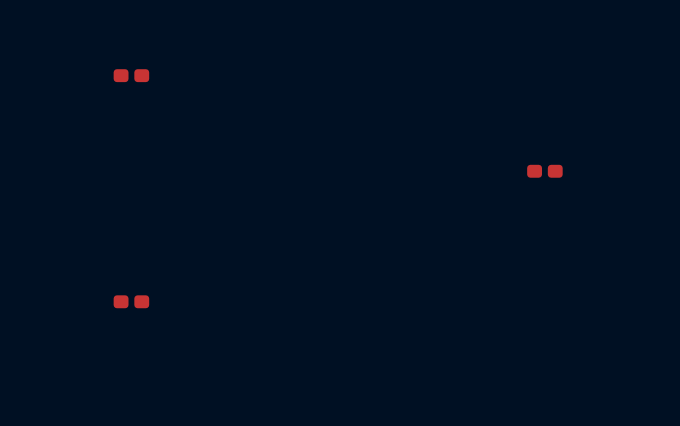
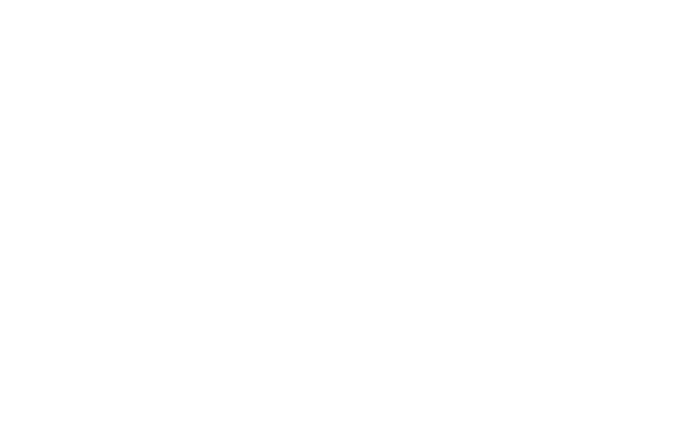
part: (131, 75) -> none
part: (544, 171) -> none
part: (131, 301) -> none

